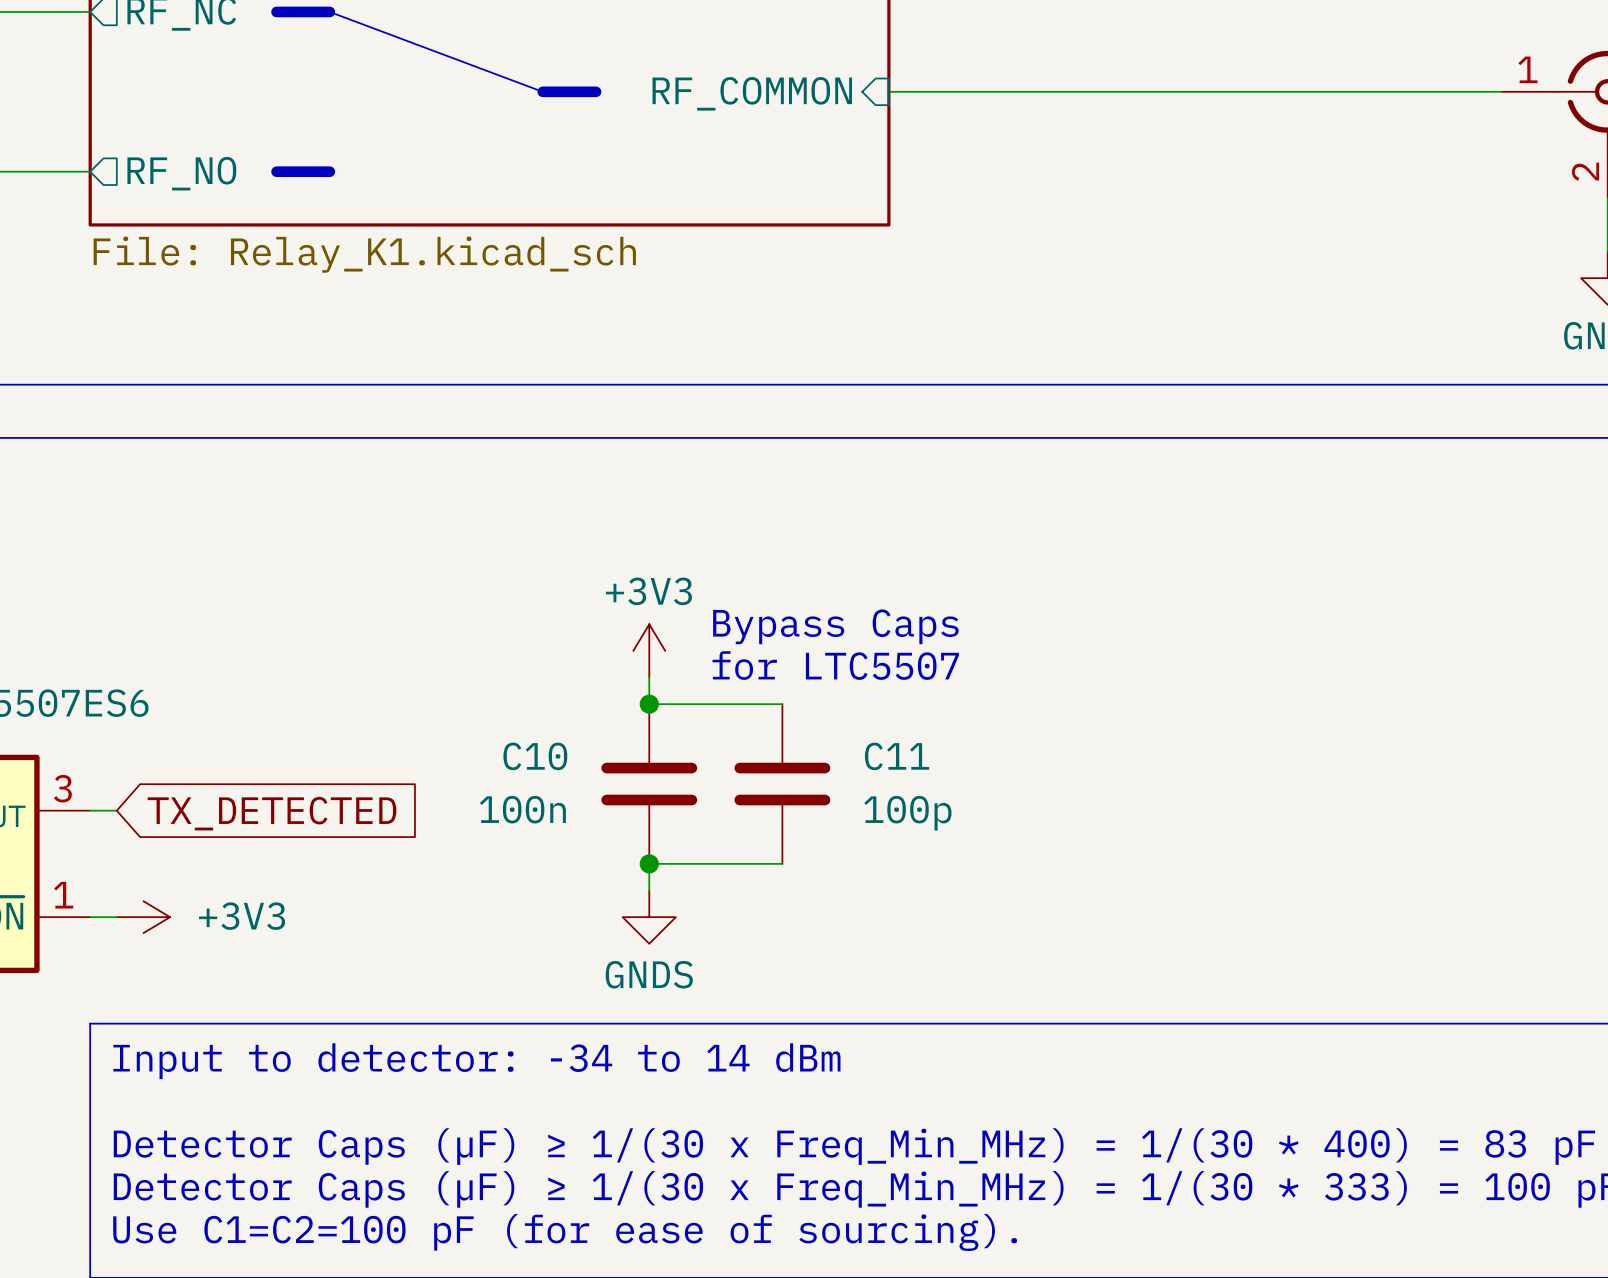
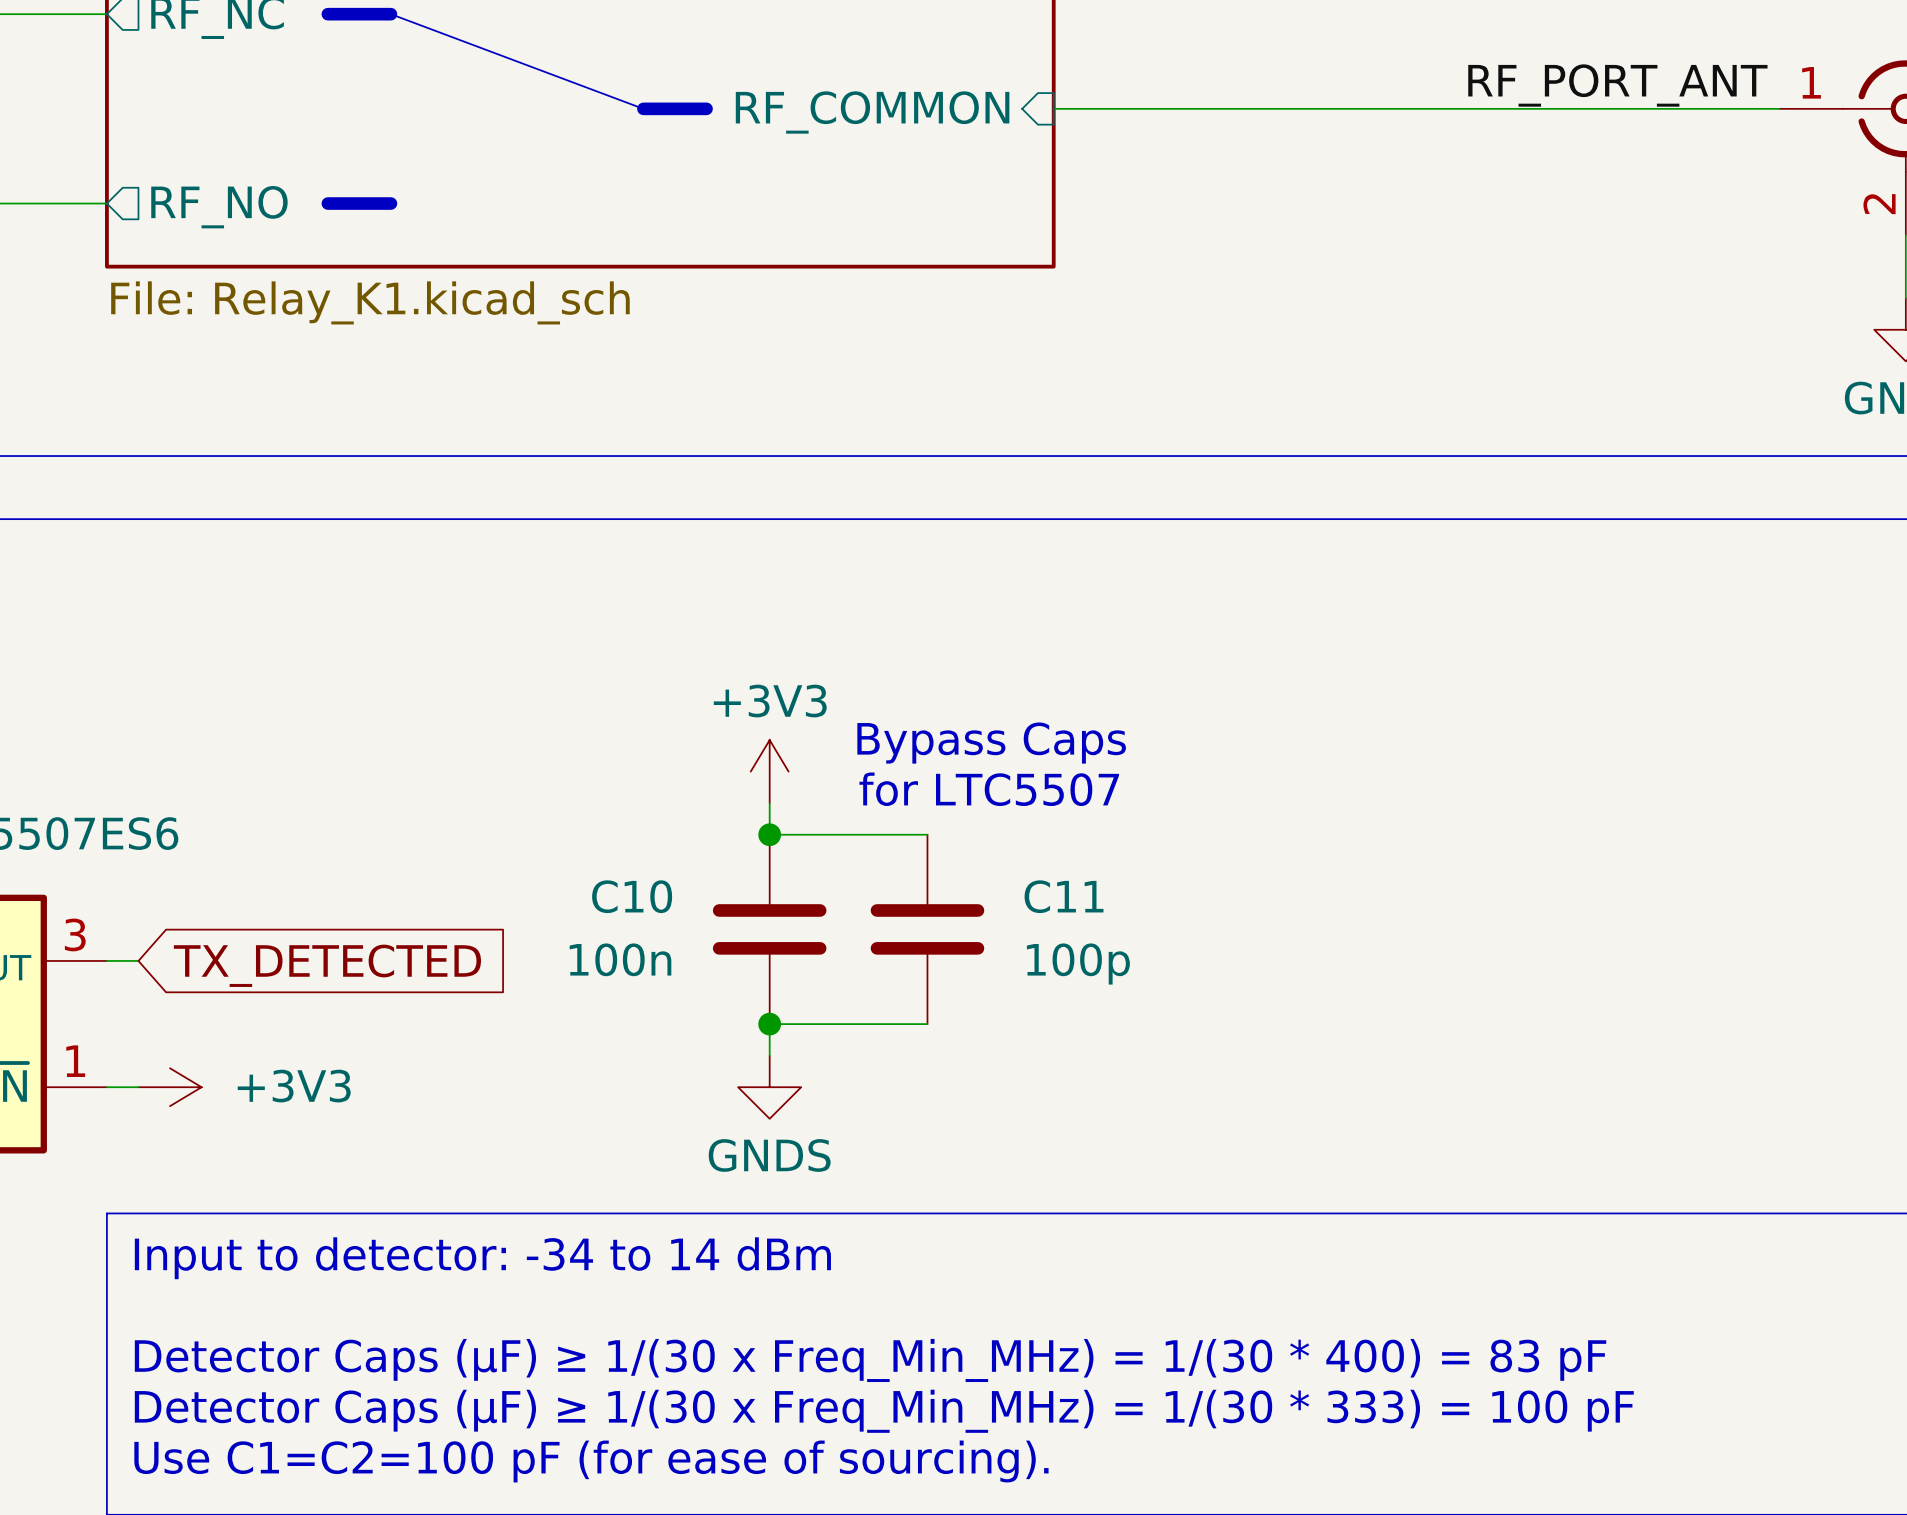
label: none -> RF_PORT_ANT (1617, 85)

